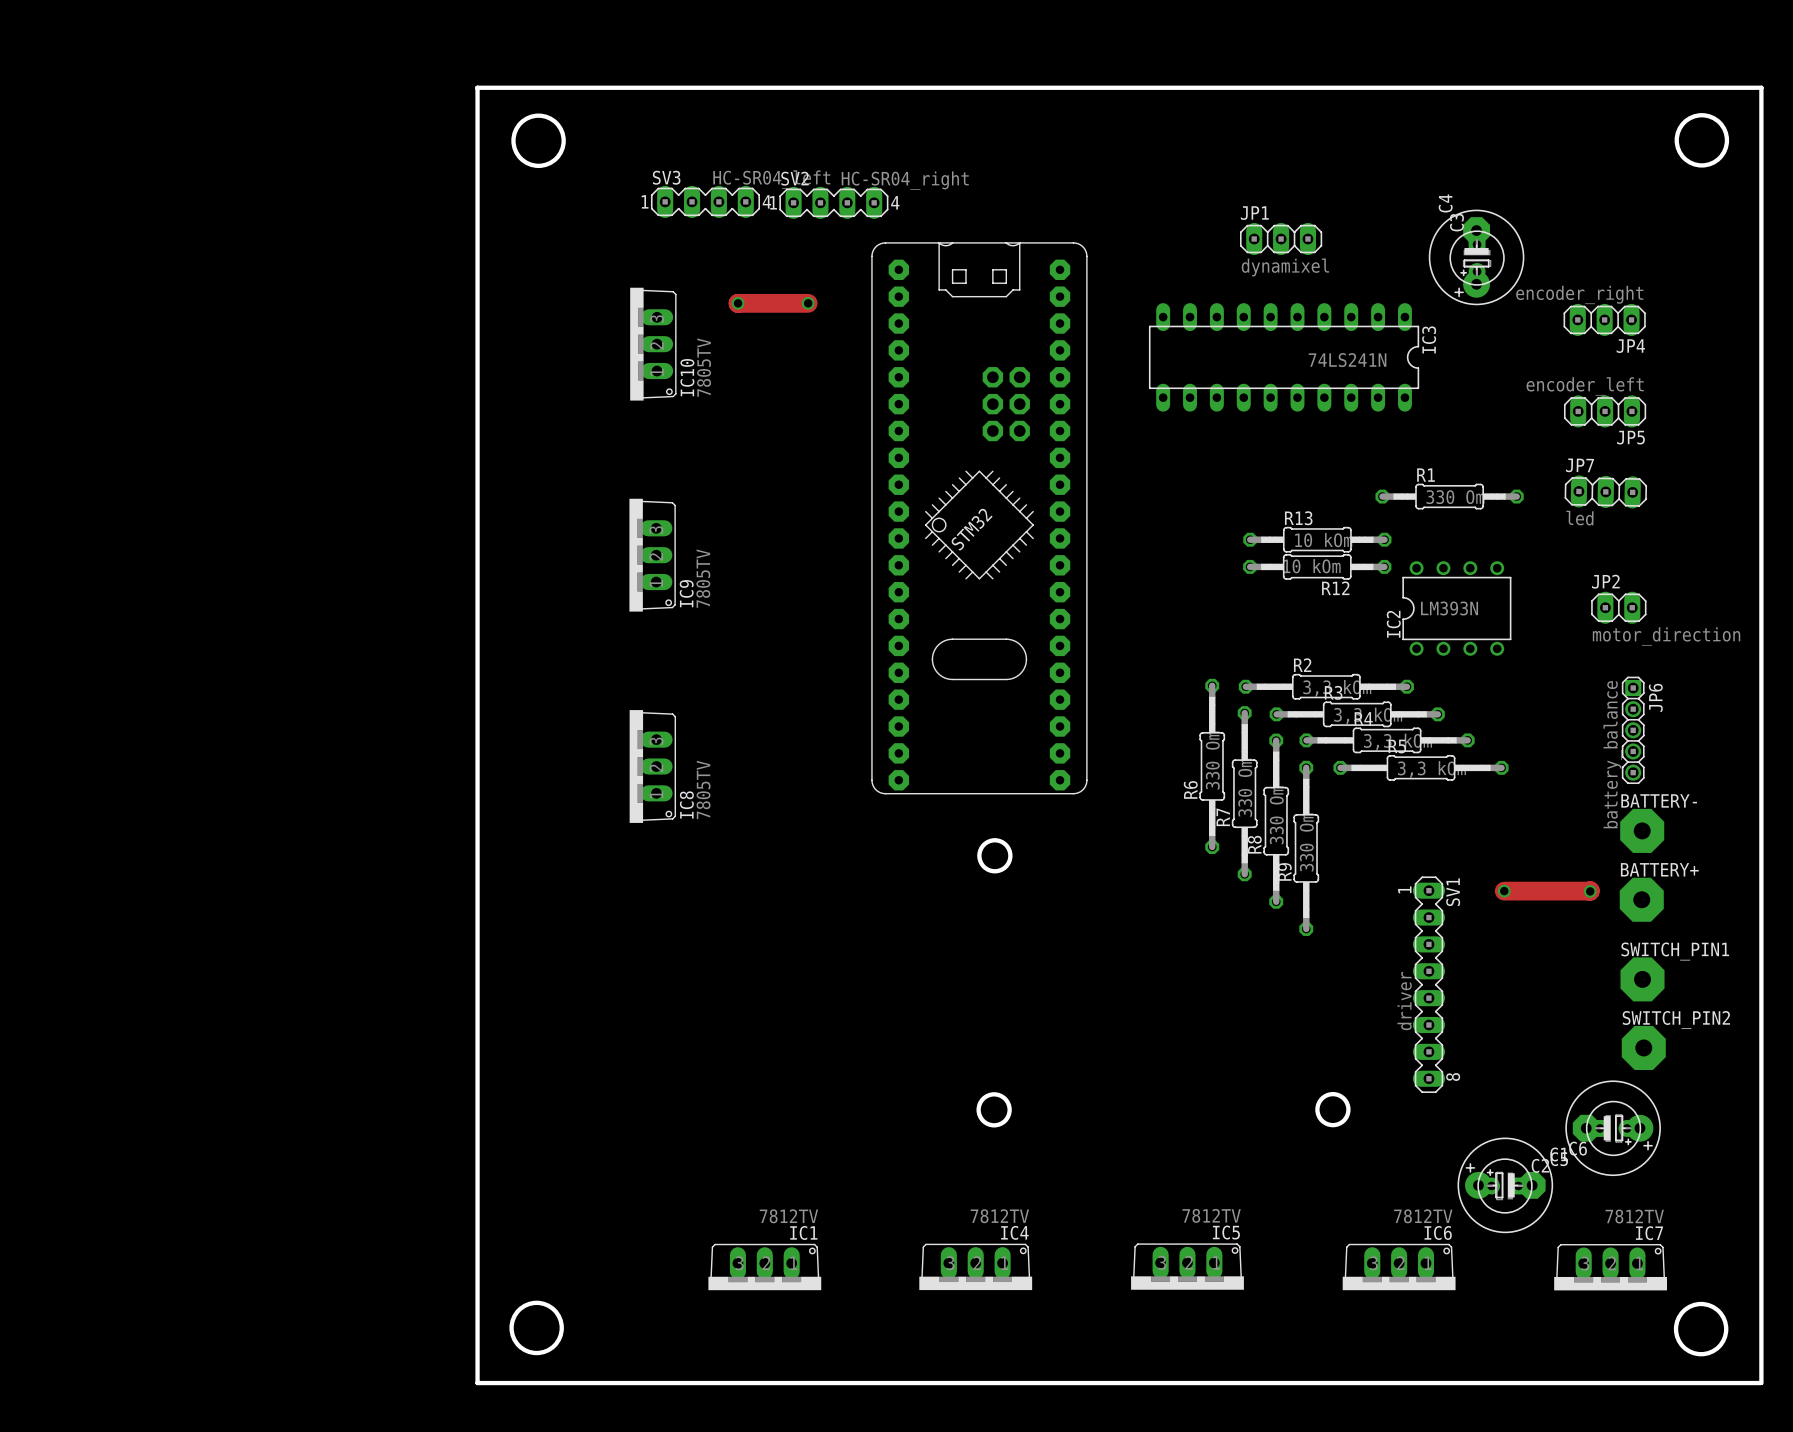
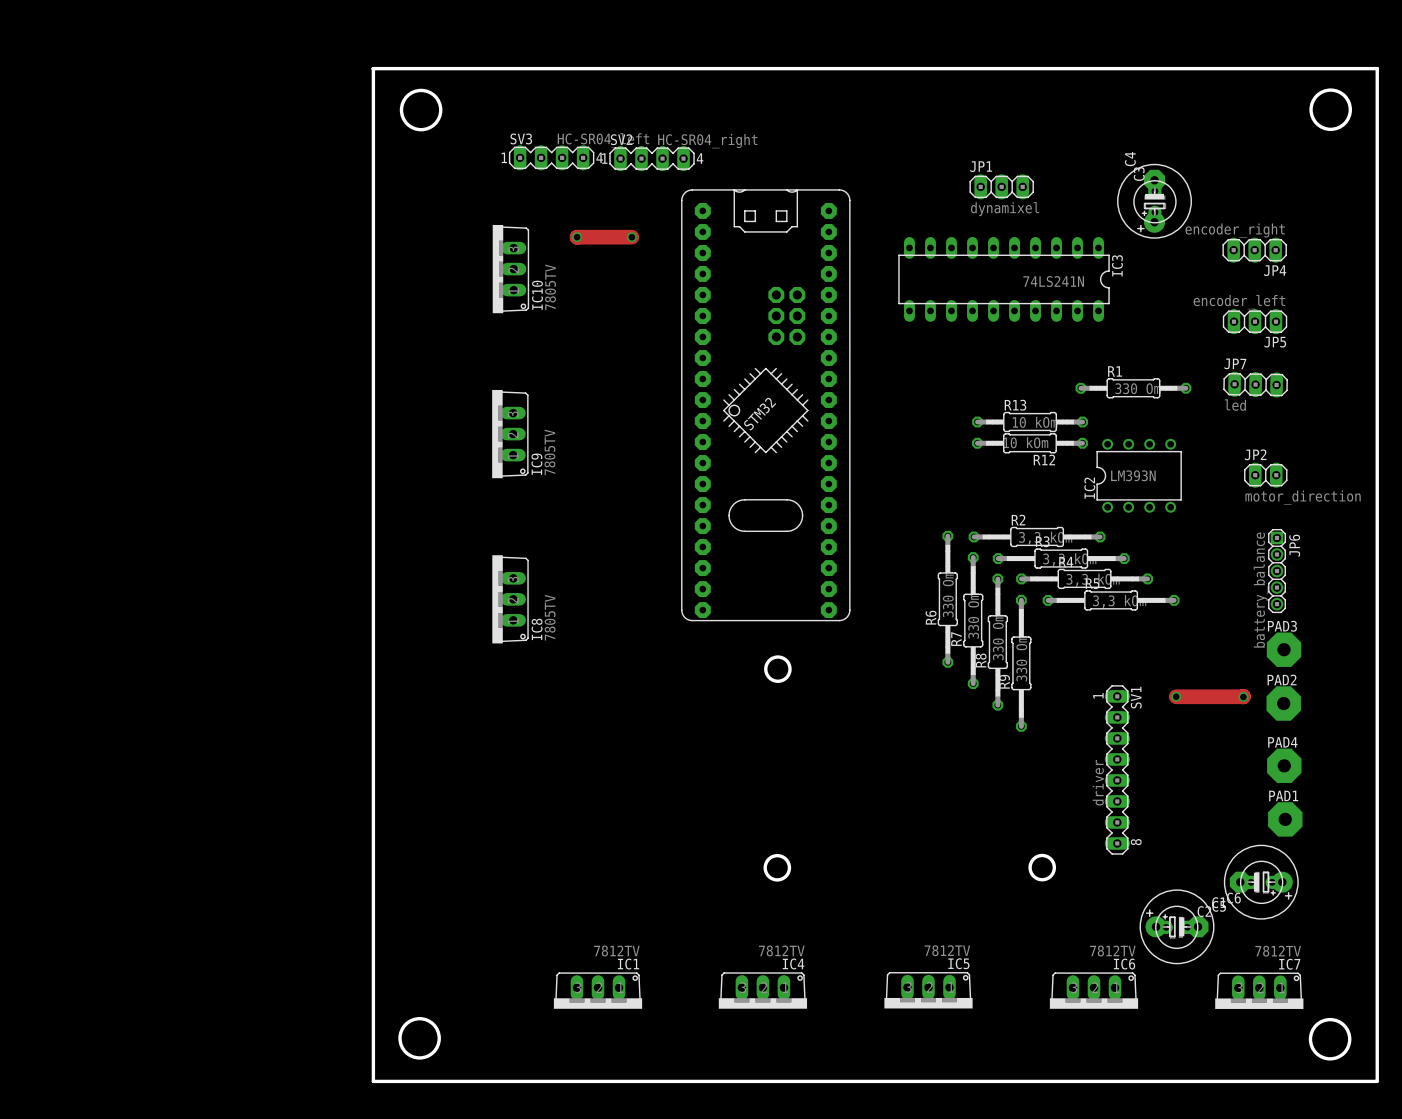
BATTERY- name: BATTERY- (1659, 800) -> PAD3 (1282, 626)
BATTERY+ name: BATTERY+ (1659, 869) -> PAD2 (1282, 679)
SWITCH_PIN1 name: SWITCH_PIN1 (1675, 951) -> PAD4 (1282, 742)
SWITCH_PIN2 name: SWITCH_PIN2 (1676, 1020) -> PAD1 (1283, 795)

